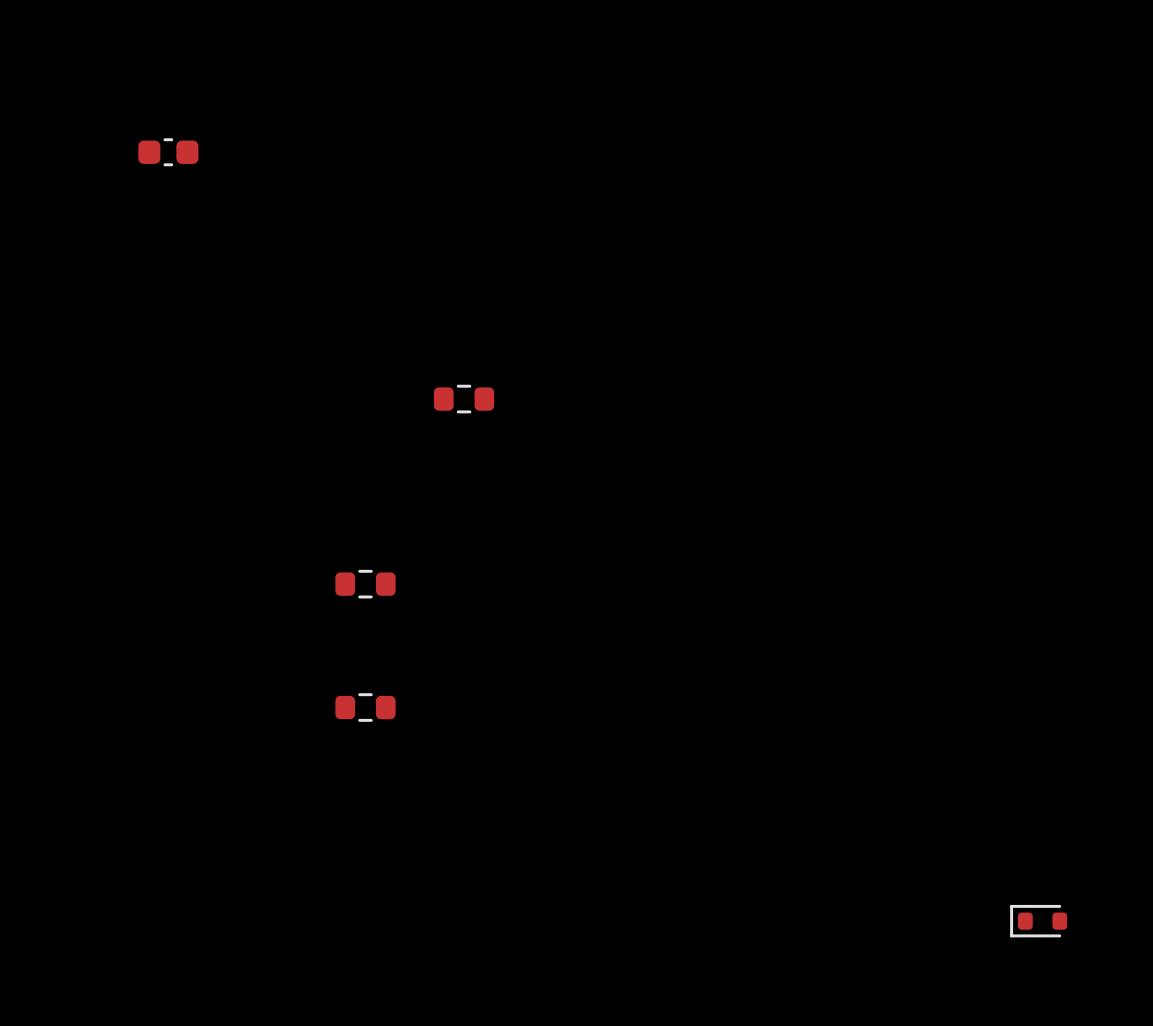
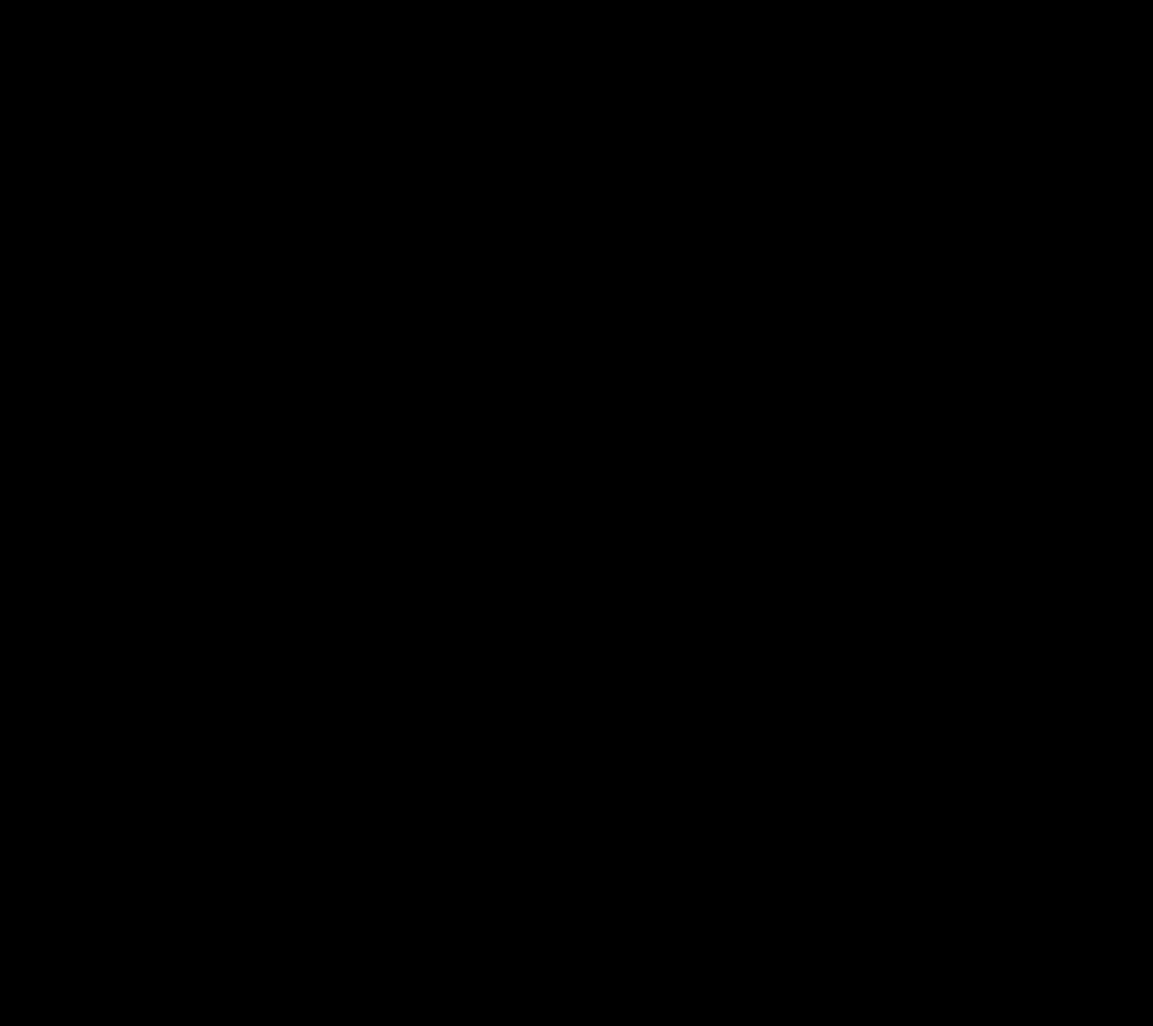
part: (168, 152) -> none
part: (464, 399) -> none
part: (365, 584) -> none
part: (365, 707) -> none
part: (1038, 921) -> none

